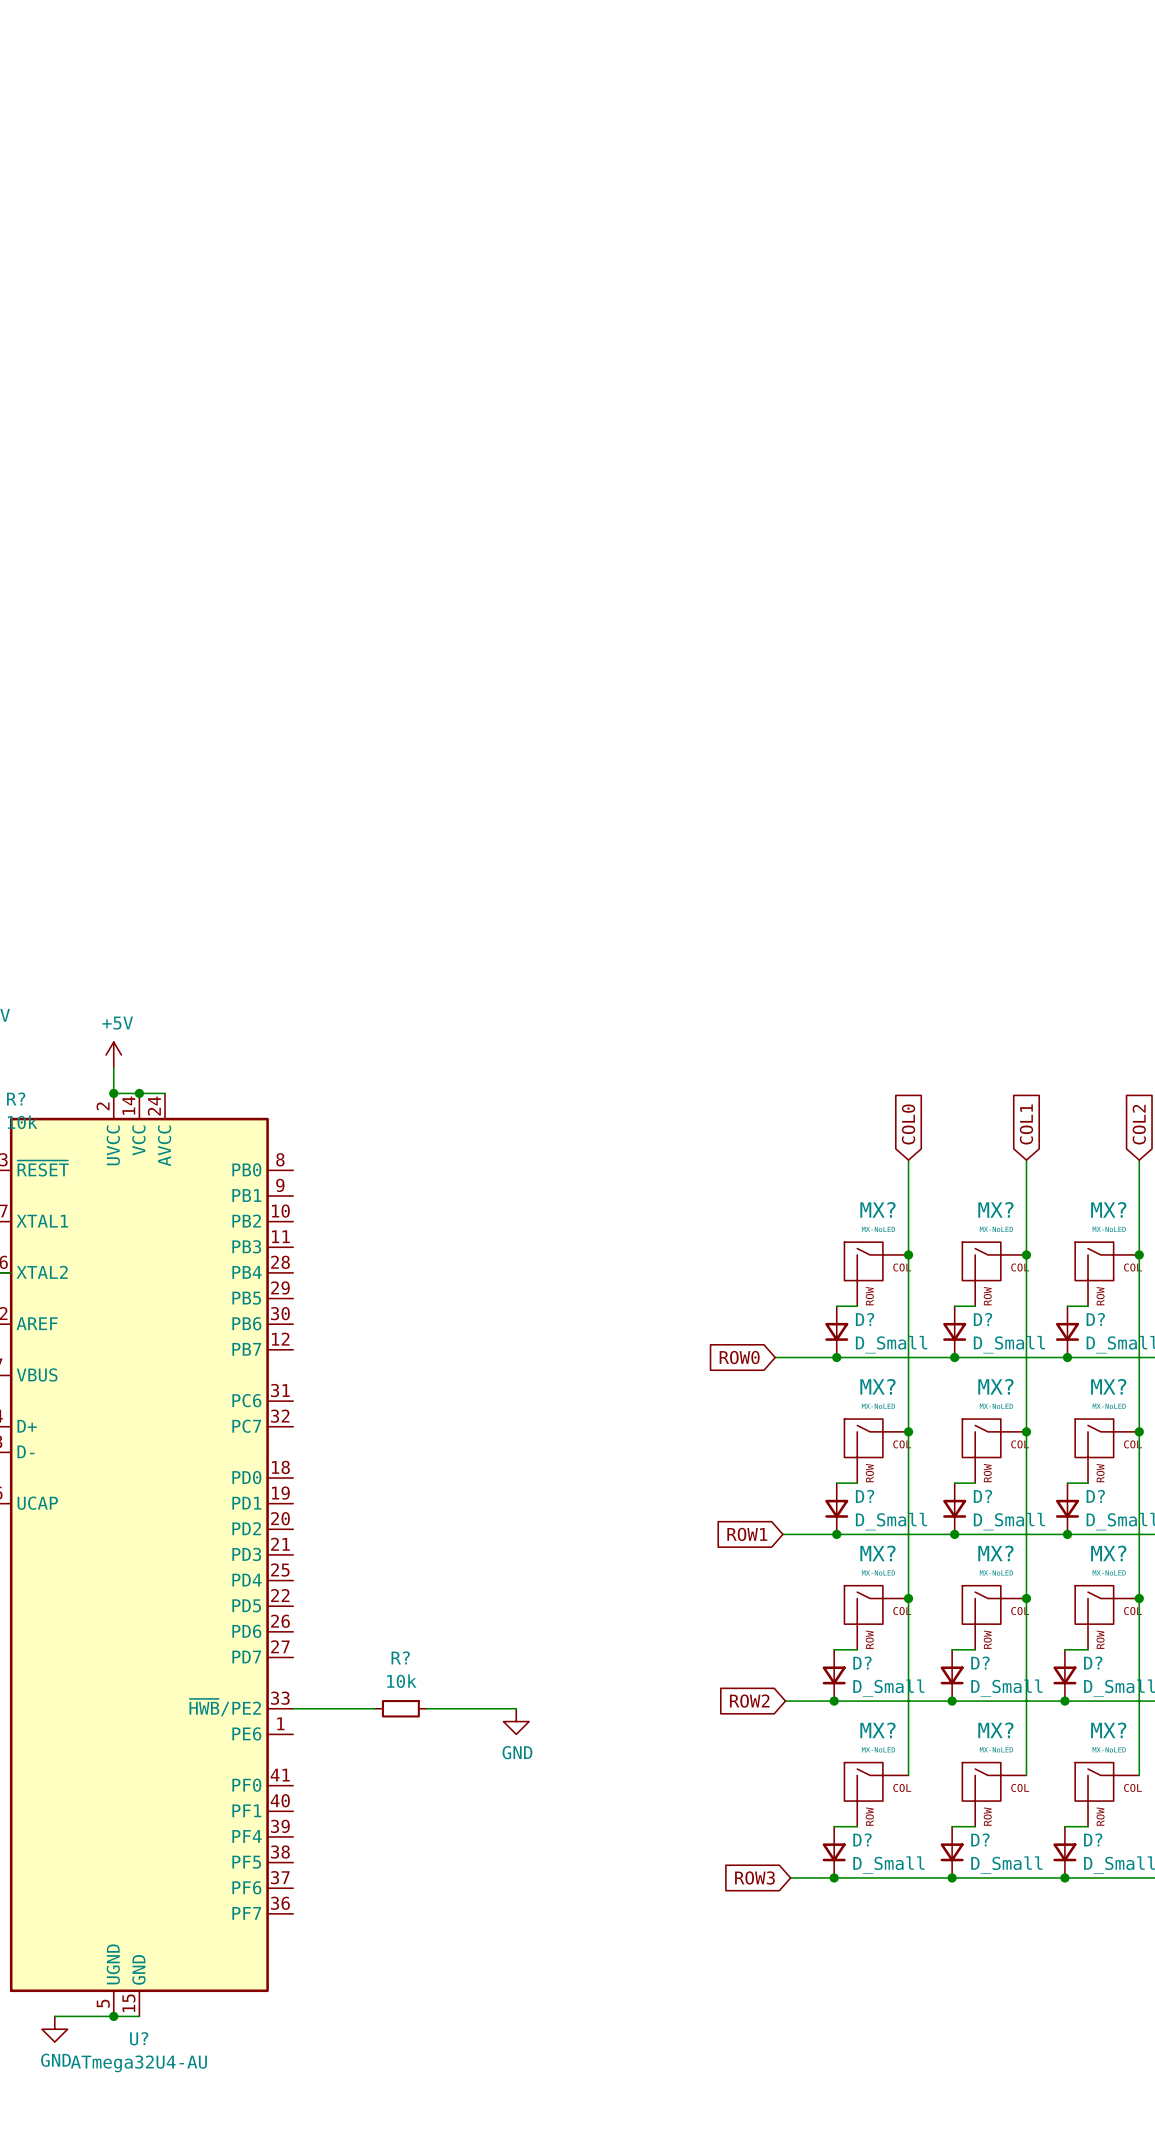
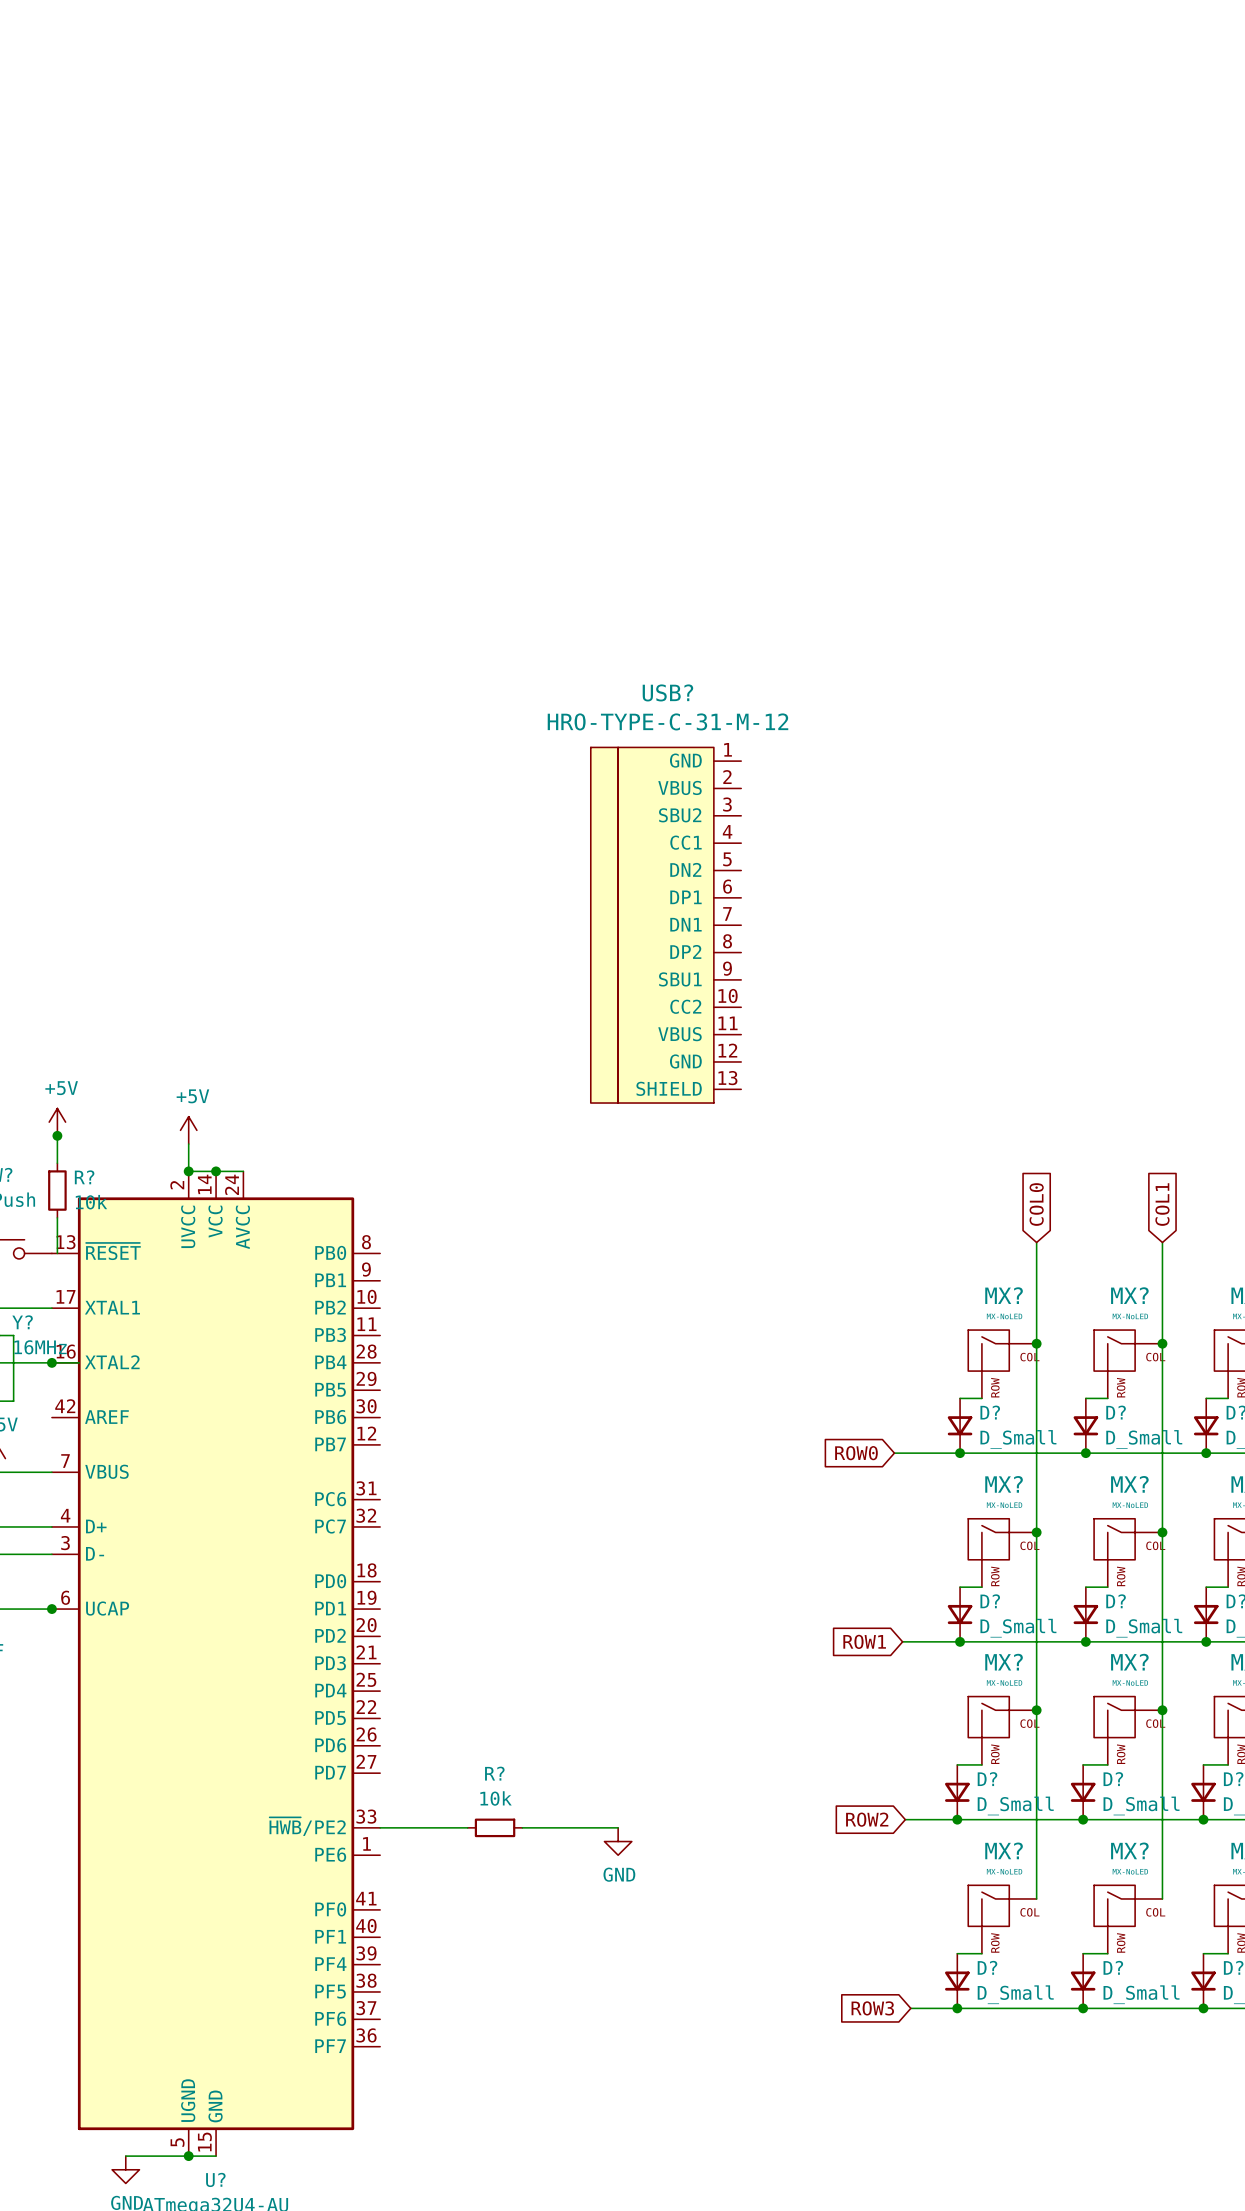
USB?: none -> HRO-TYPE-C-31-M-12 (666, 925)

